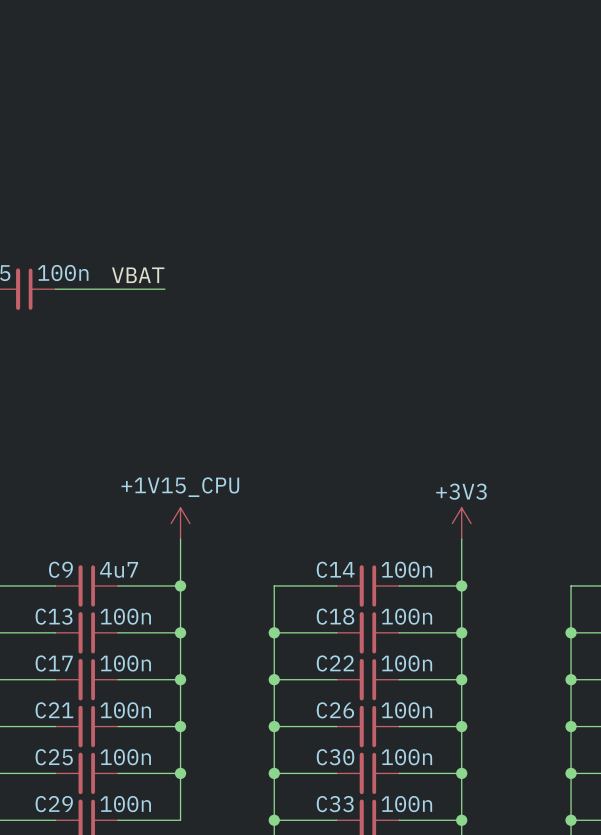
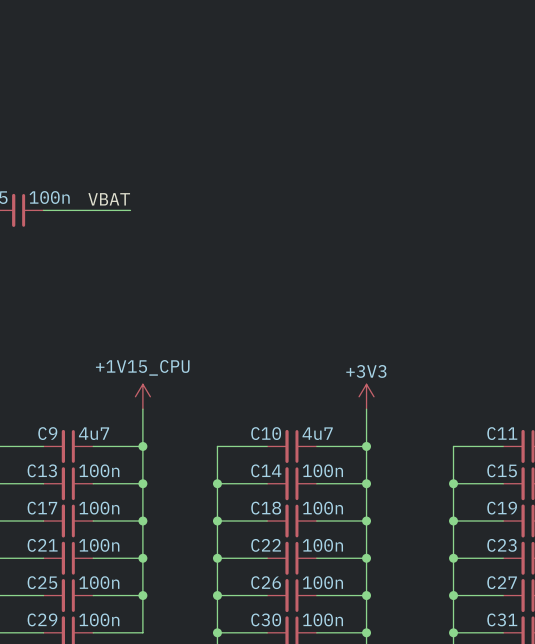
C14 name: C14 (335, 569) -> C10 (266, 433)
C14 value: 100n (406, 569) -> 4u7 (317, 433)
C18 name: C18 (335, 616) -> C14 (266, 470)
C22 name: C22 (335, 663) -> C18 (266, 508)
C26 name: C26 (335, 710) -> C22 (266, 545)
C30 name: C30 (335, 757) -> C26 (266, 582)
C33 name: C33 (335, 804) -> C30 (266, 619)

